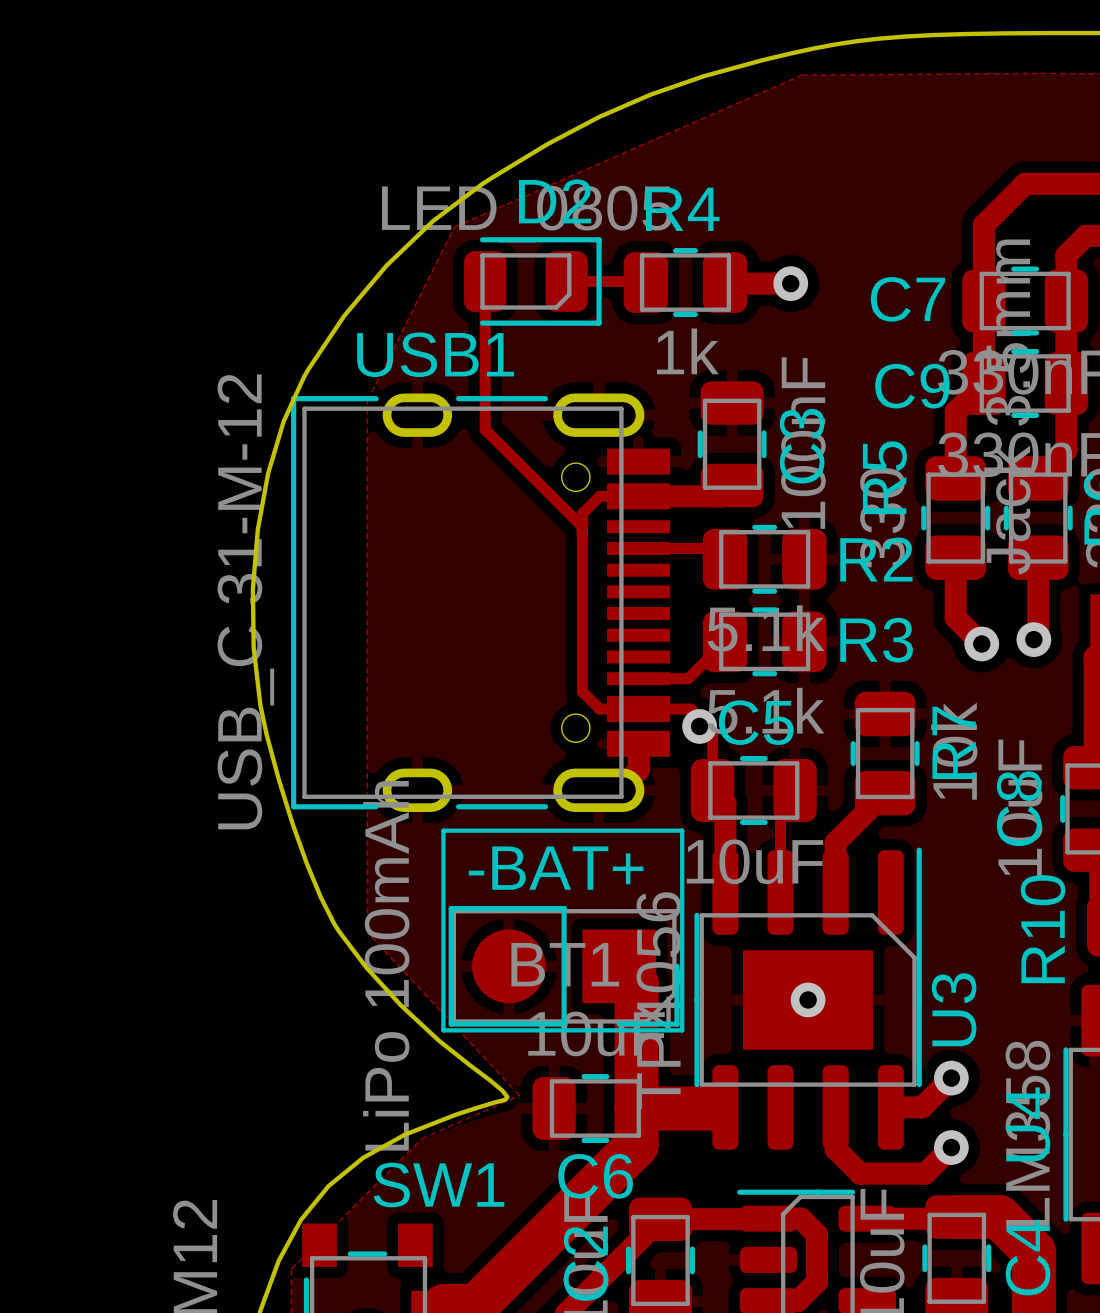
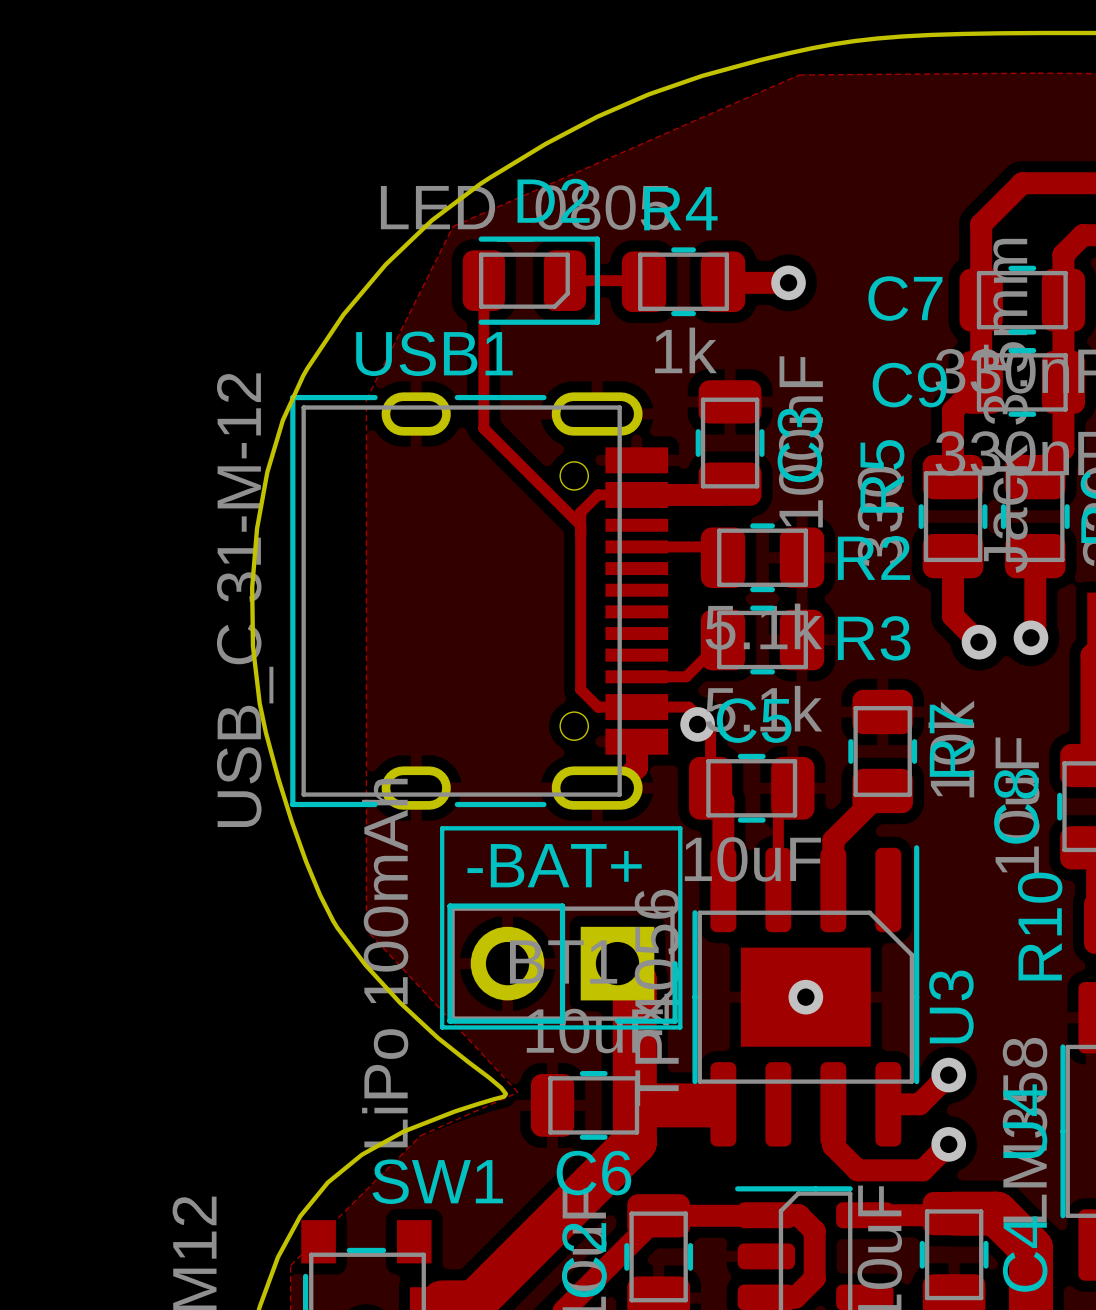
BT1 footprint: [448, 905, 680, 1027] -> [447, 903, 678, 1024]

